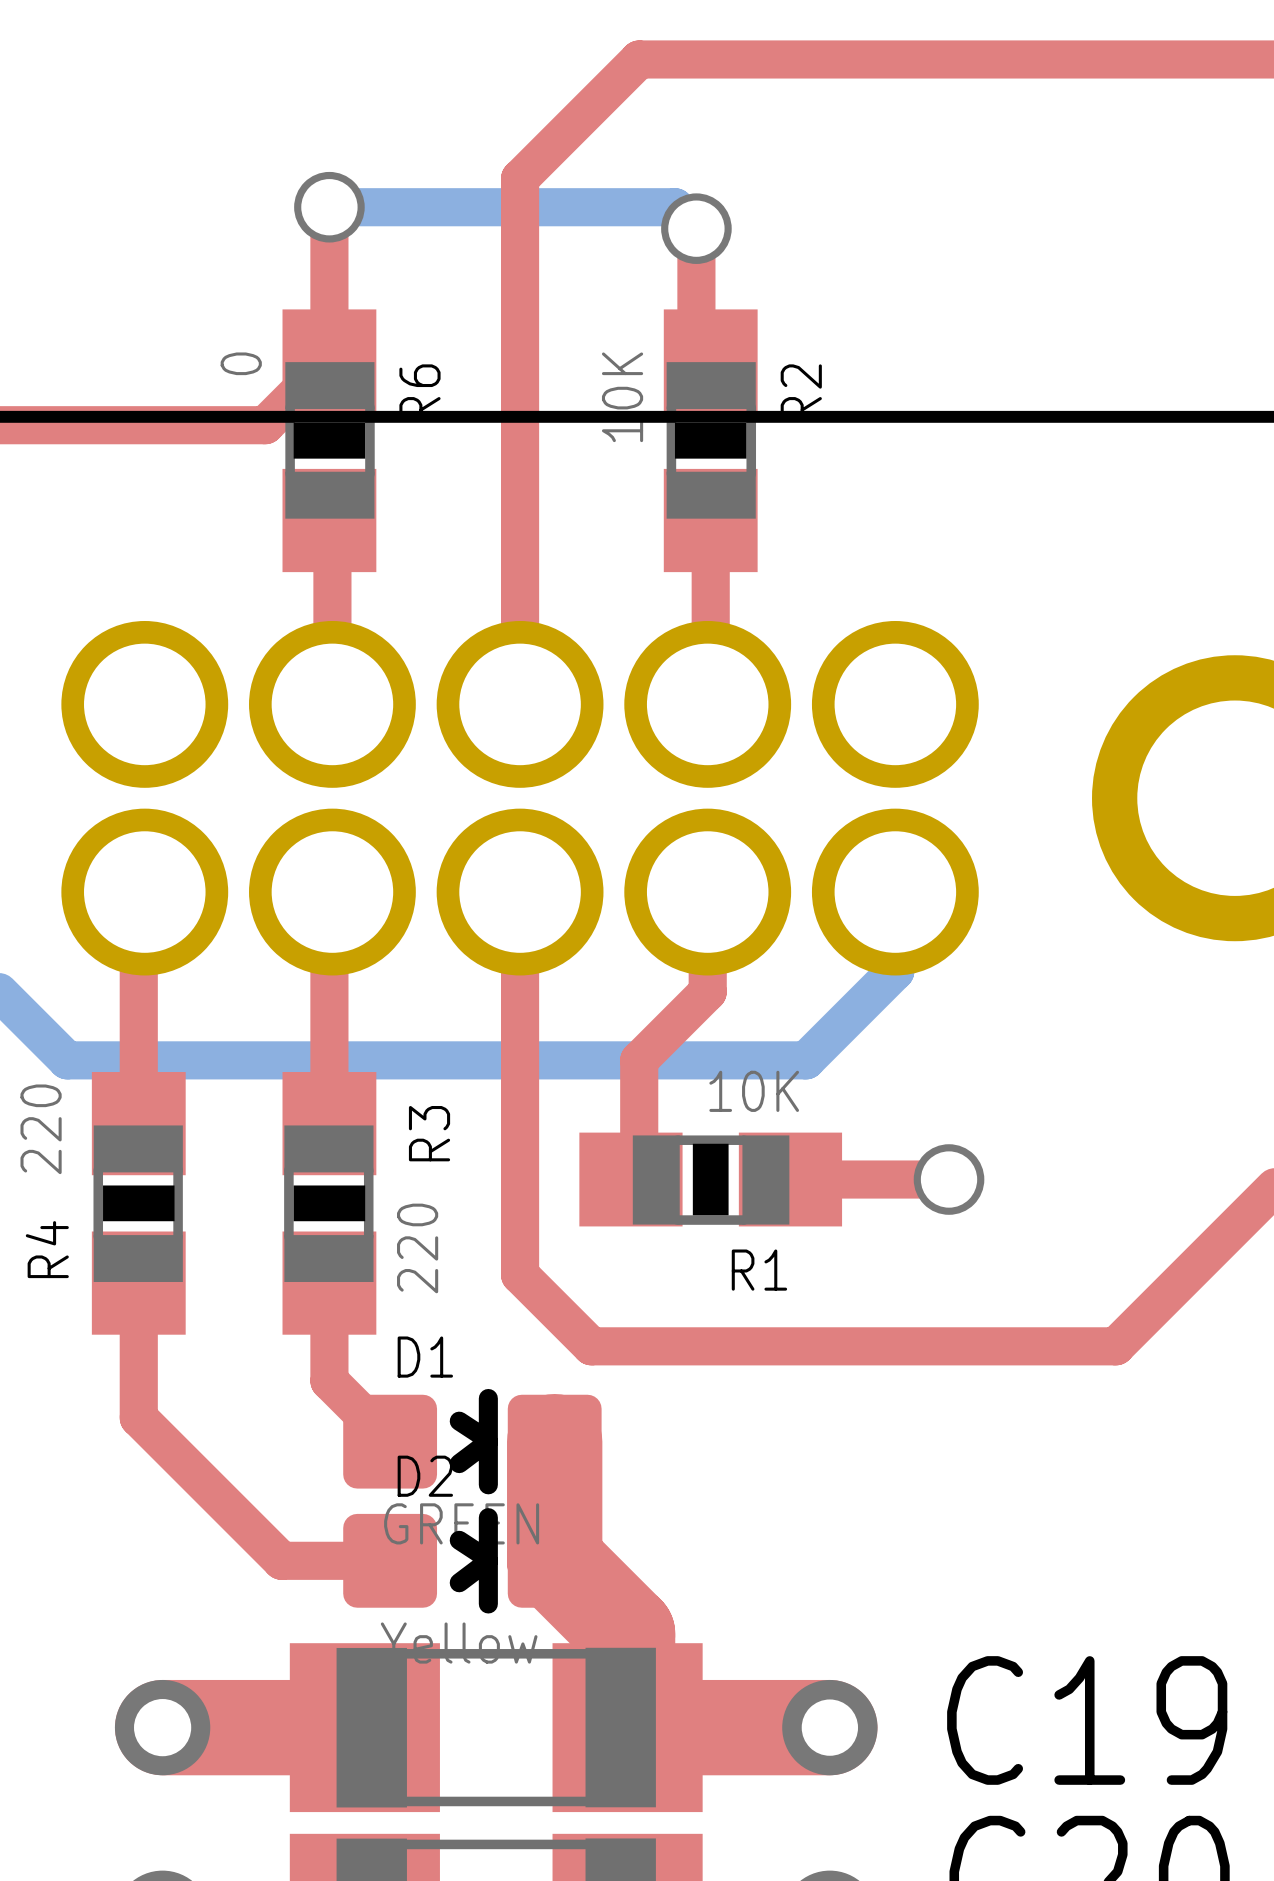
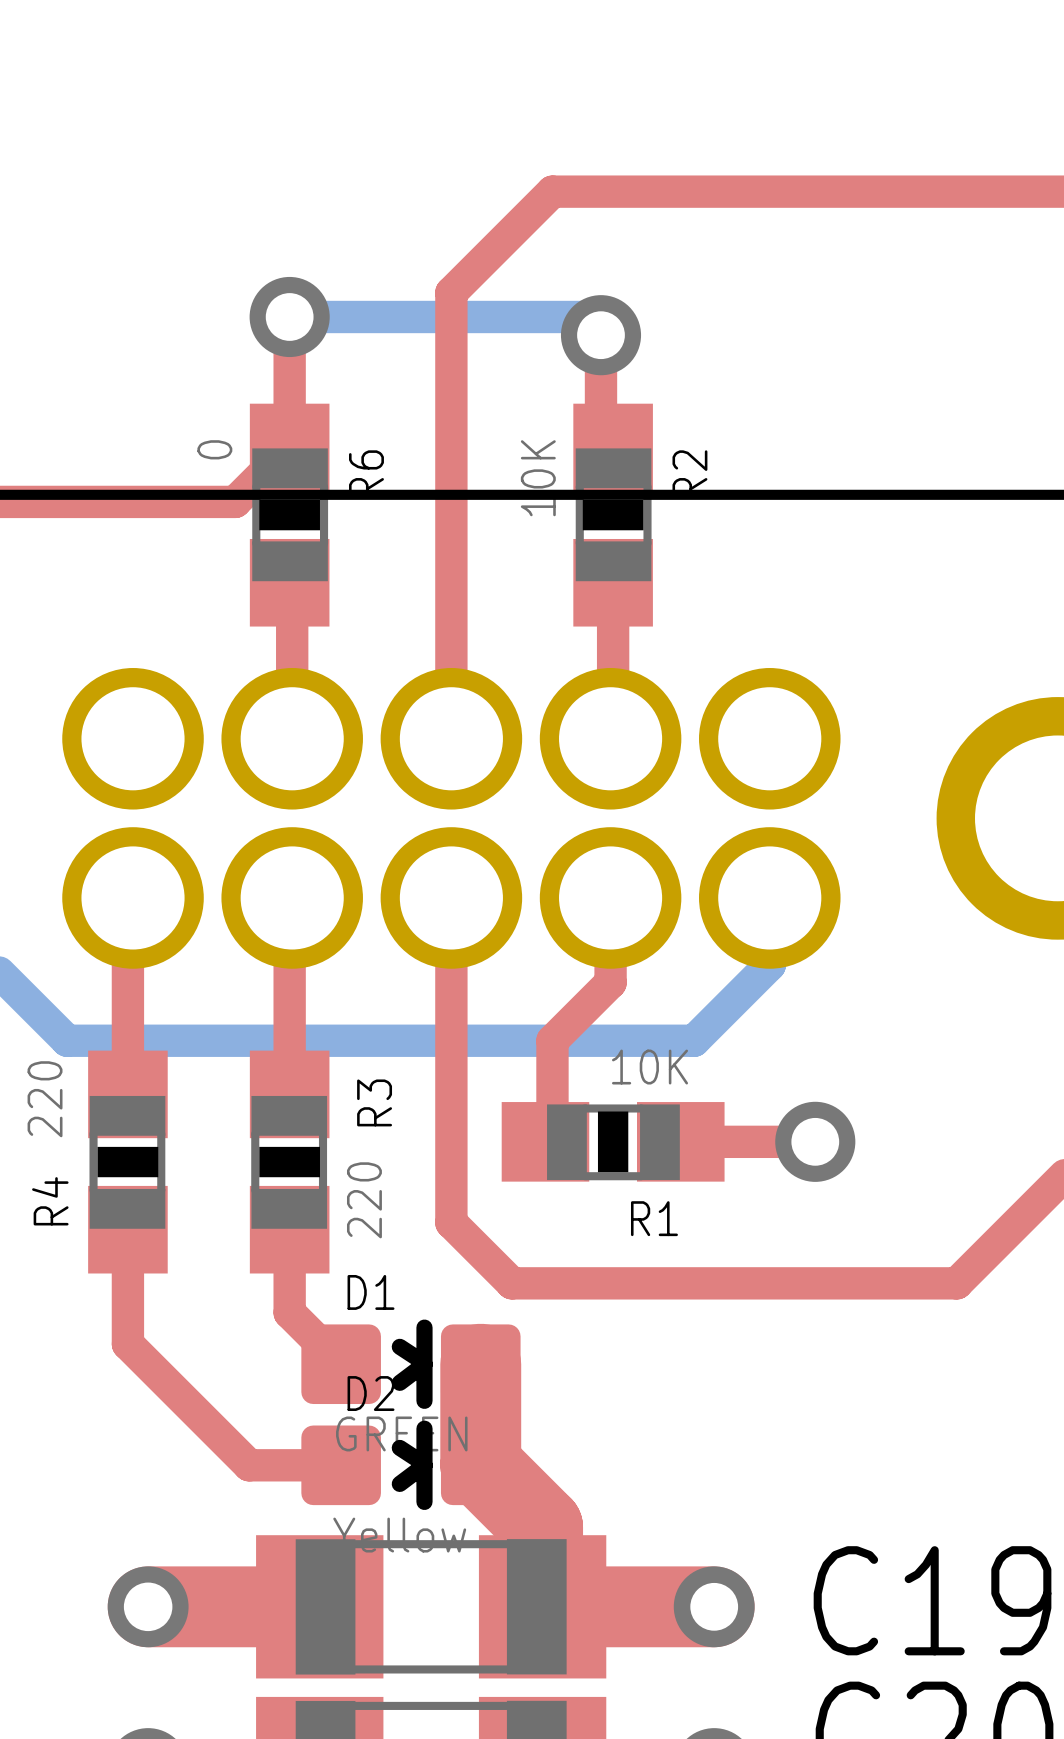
via size: [294, 171, 365, 243] -> [249, 276, 330, 358]
via size: [661, 193, 732, 264] -> [560, 295, 642, 376]
via size: [913, 1144, 985, 1215] -> [775, 1101, 856, 1182]

